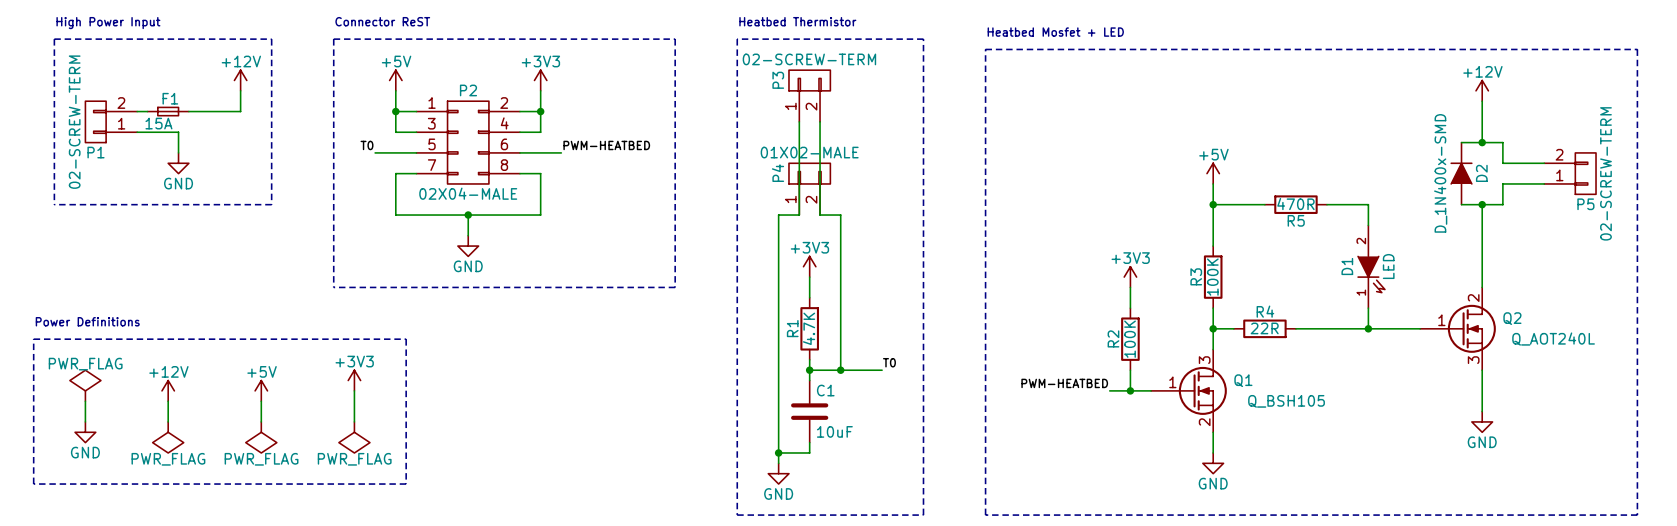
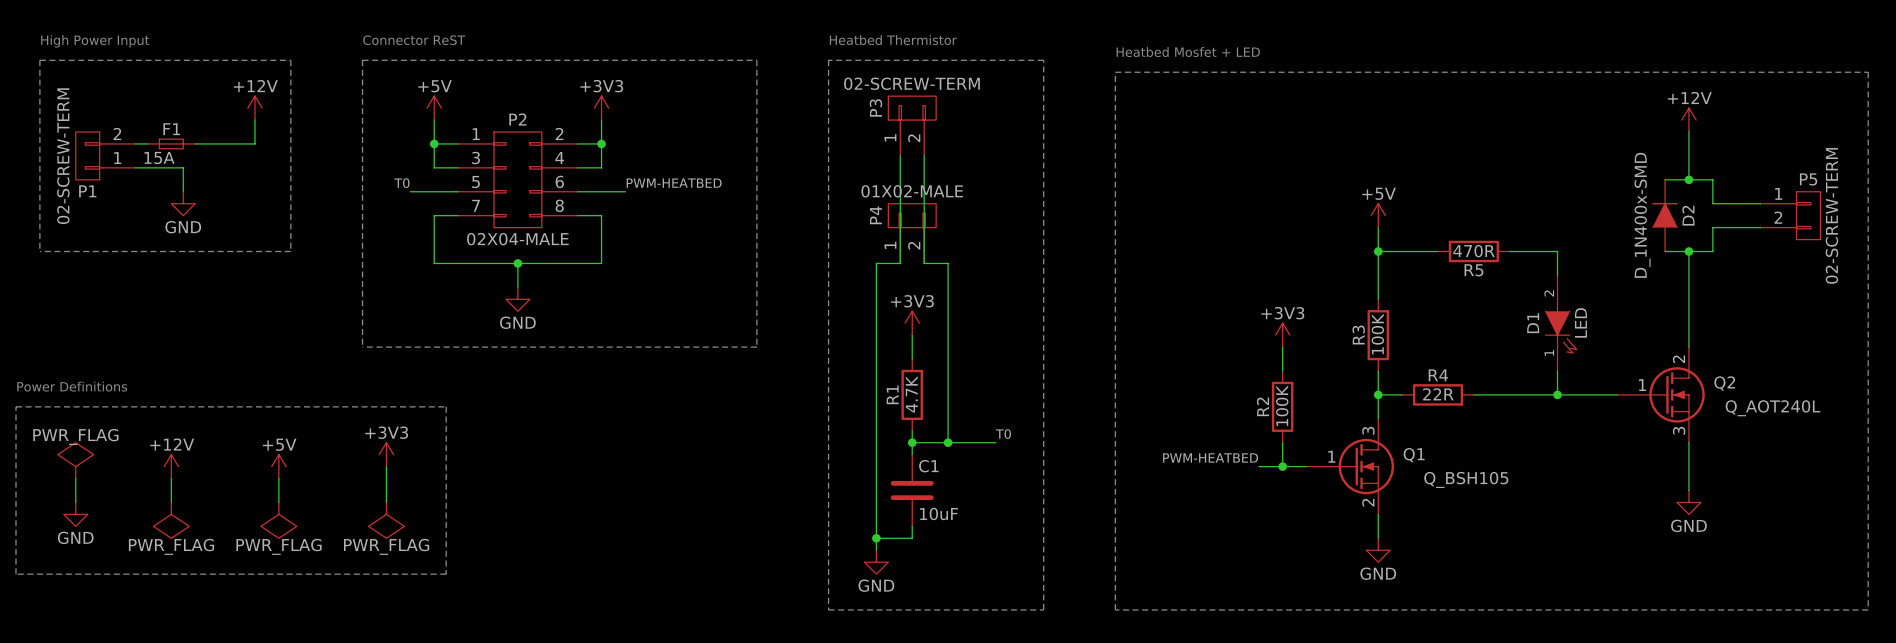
P5 flip: as is (1585, 173) -> up-down (1808, 215)

